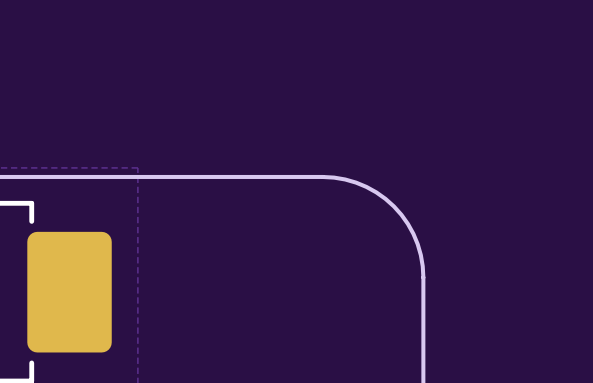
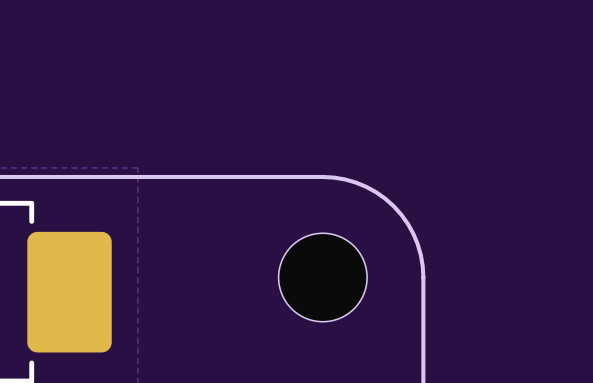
part: none -> (322, 277)

